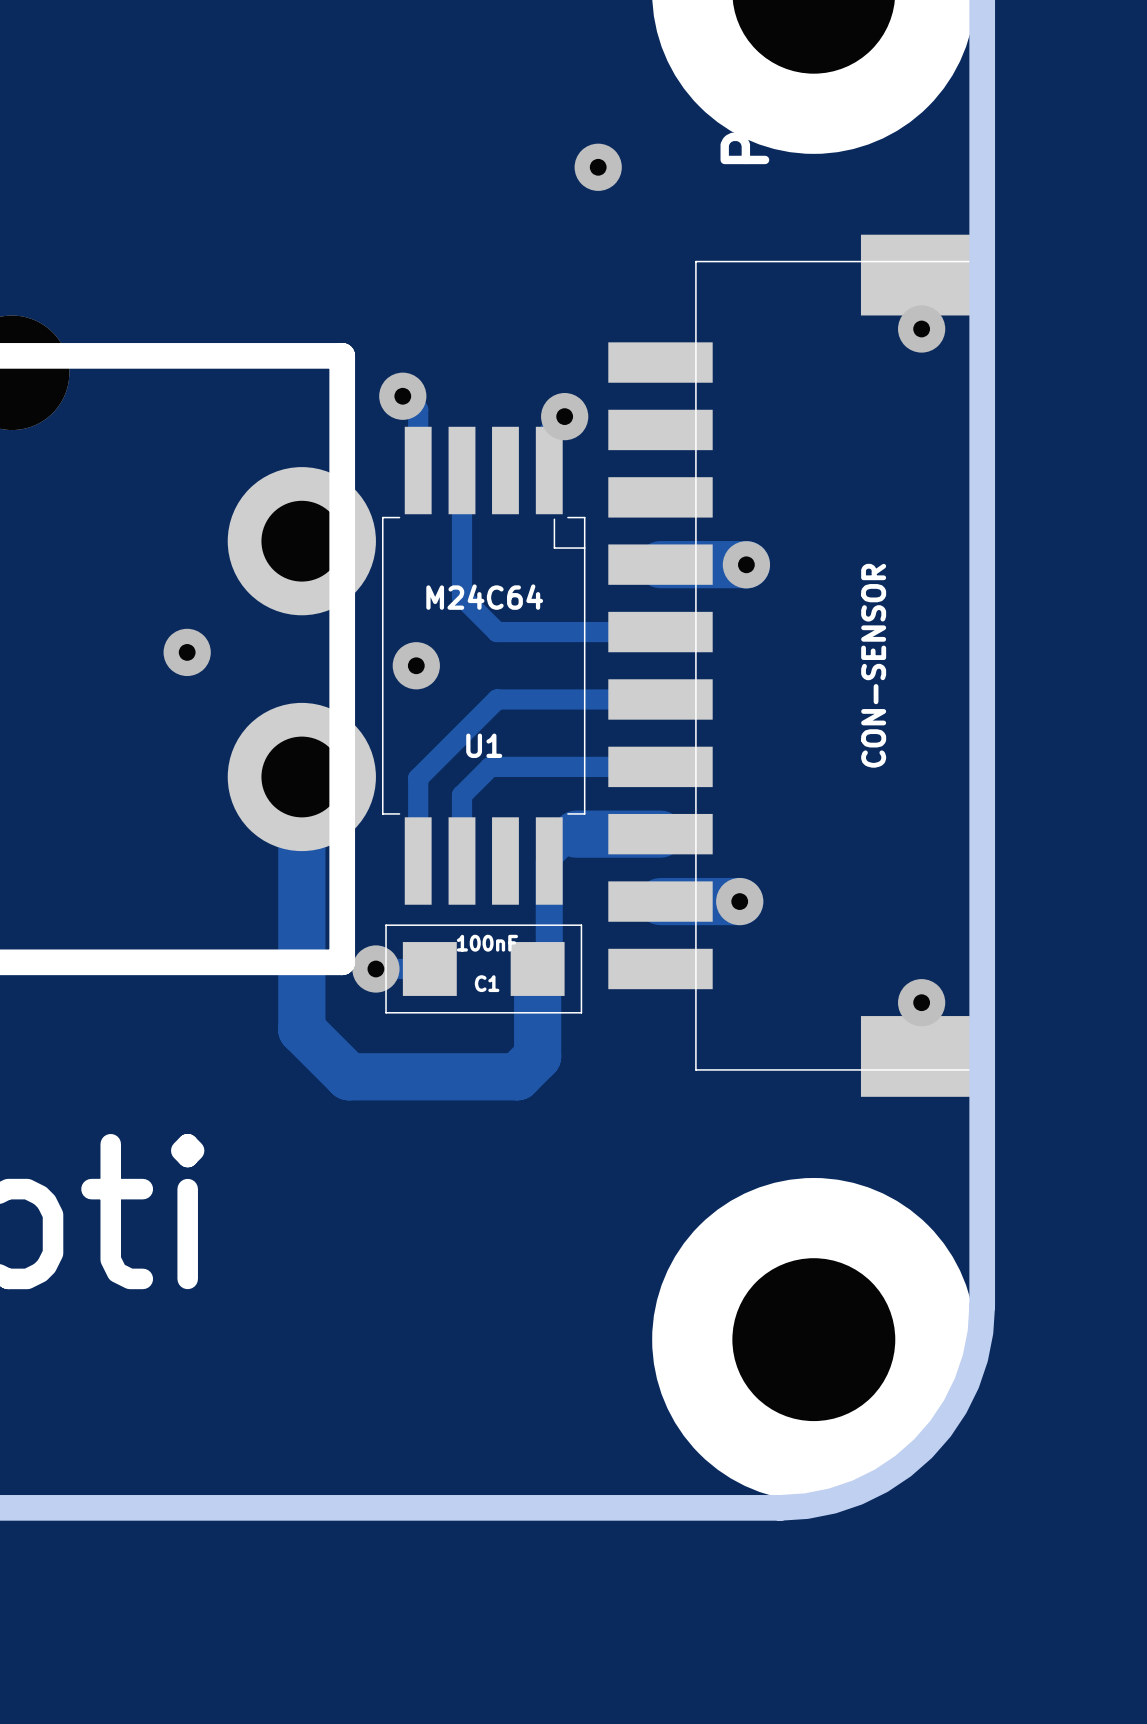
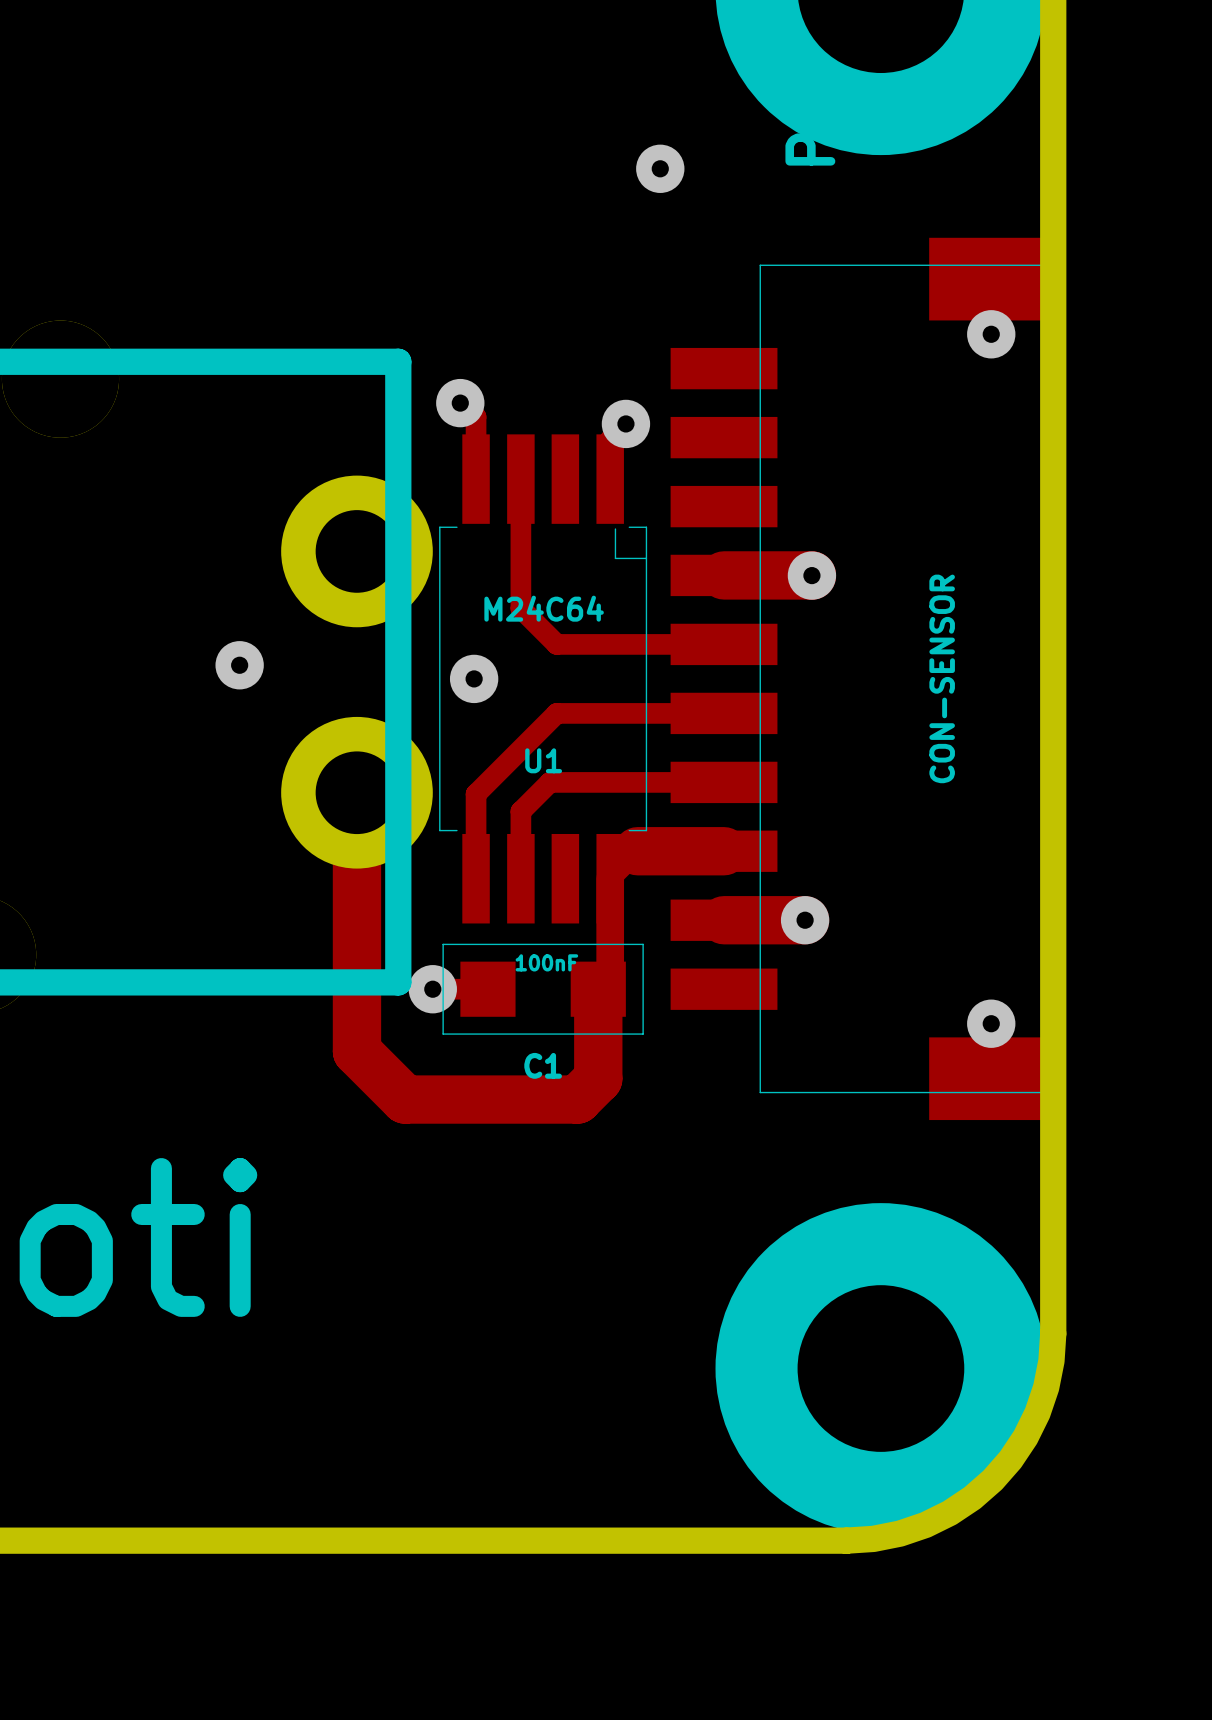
C1 name position: C1 (487, 983) -> C1 (543, 1065)

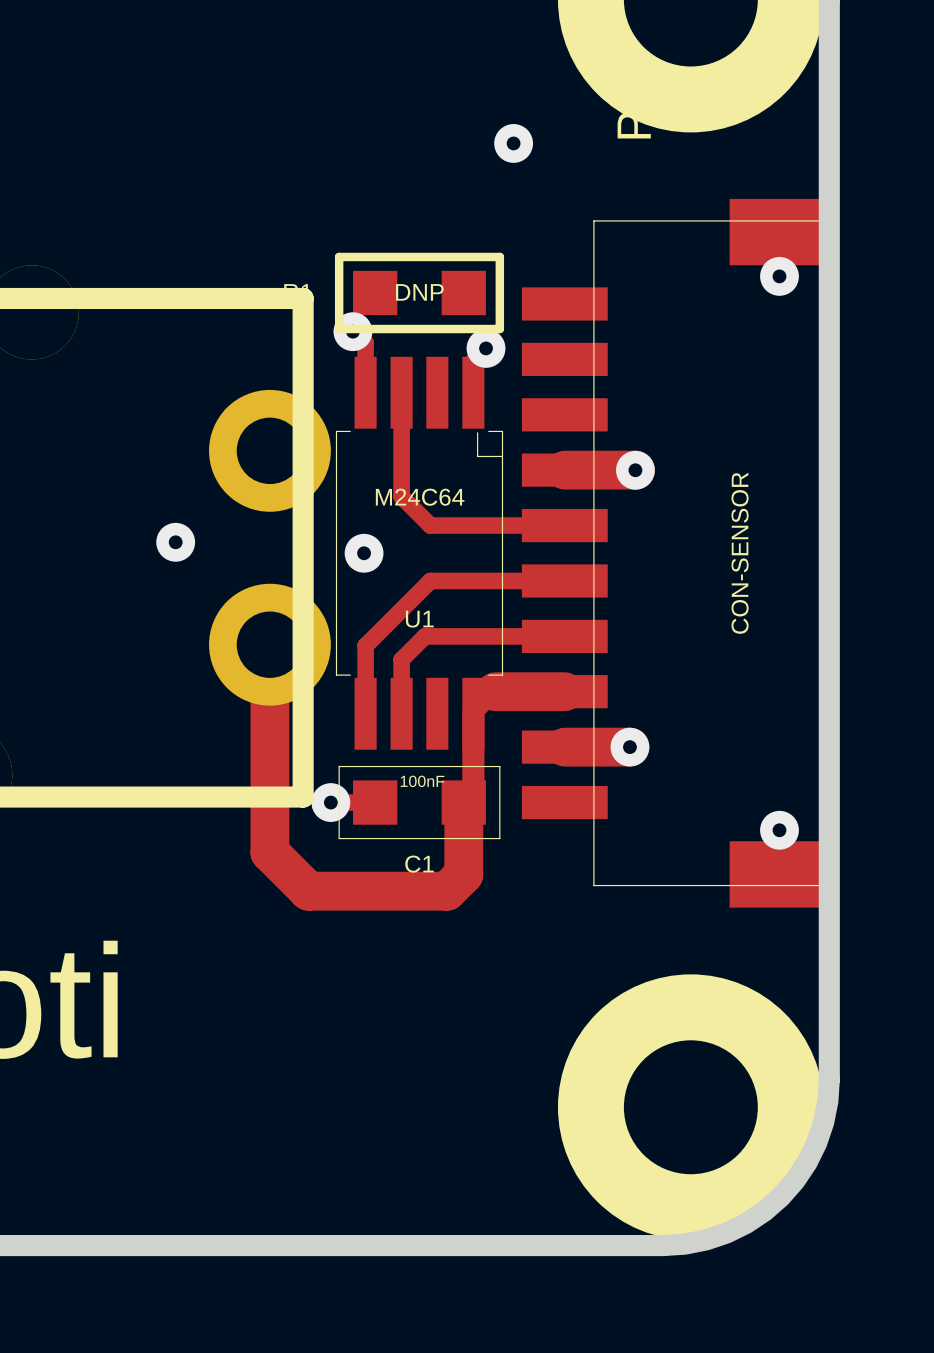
part: none -> DNP (419, 293)

